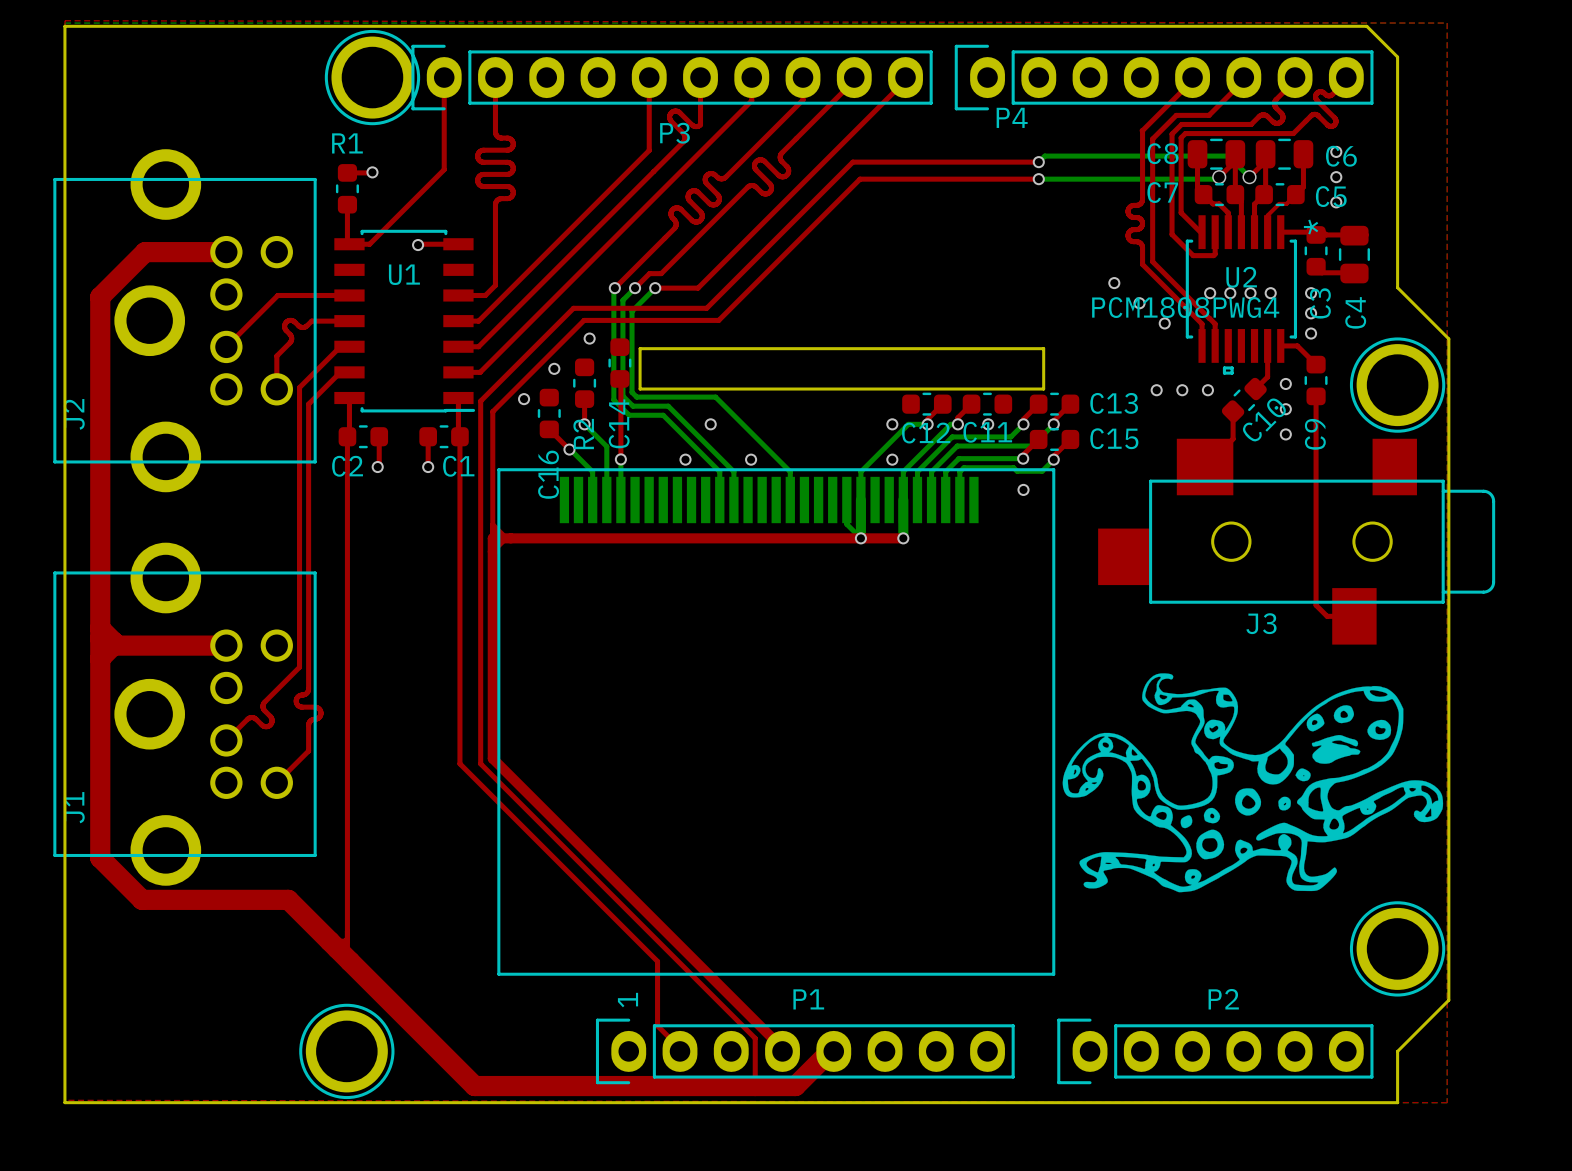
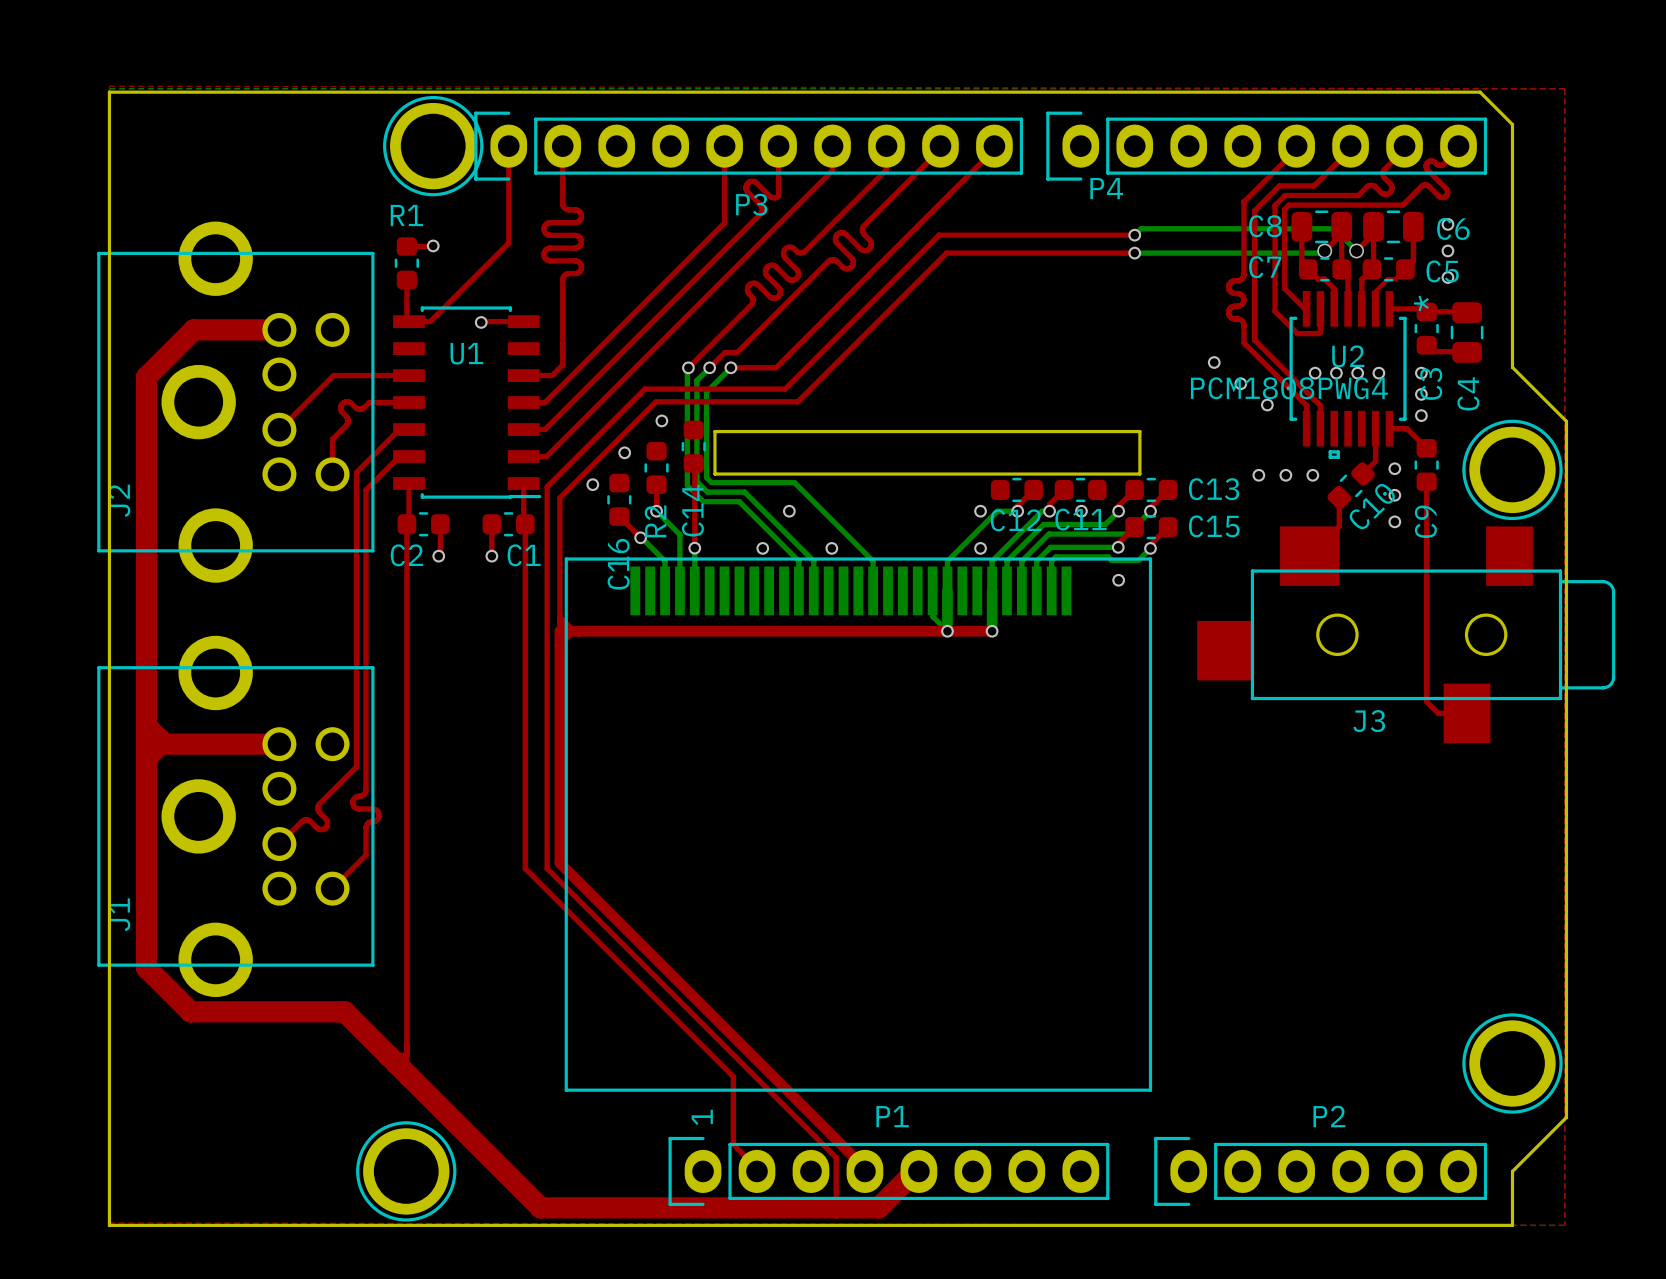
drawing: [1062, 673, 1444, 893] -> none

